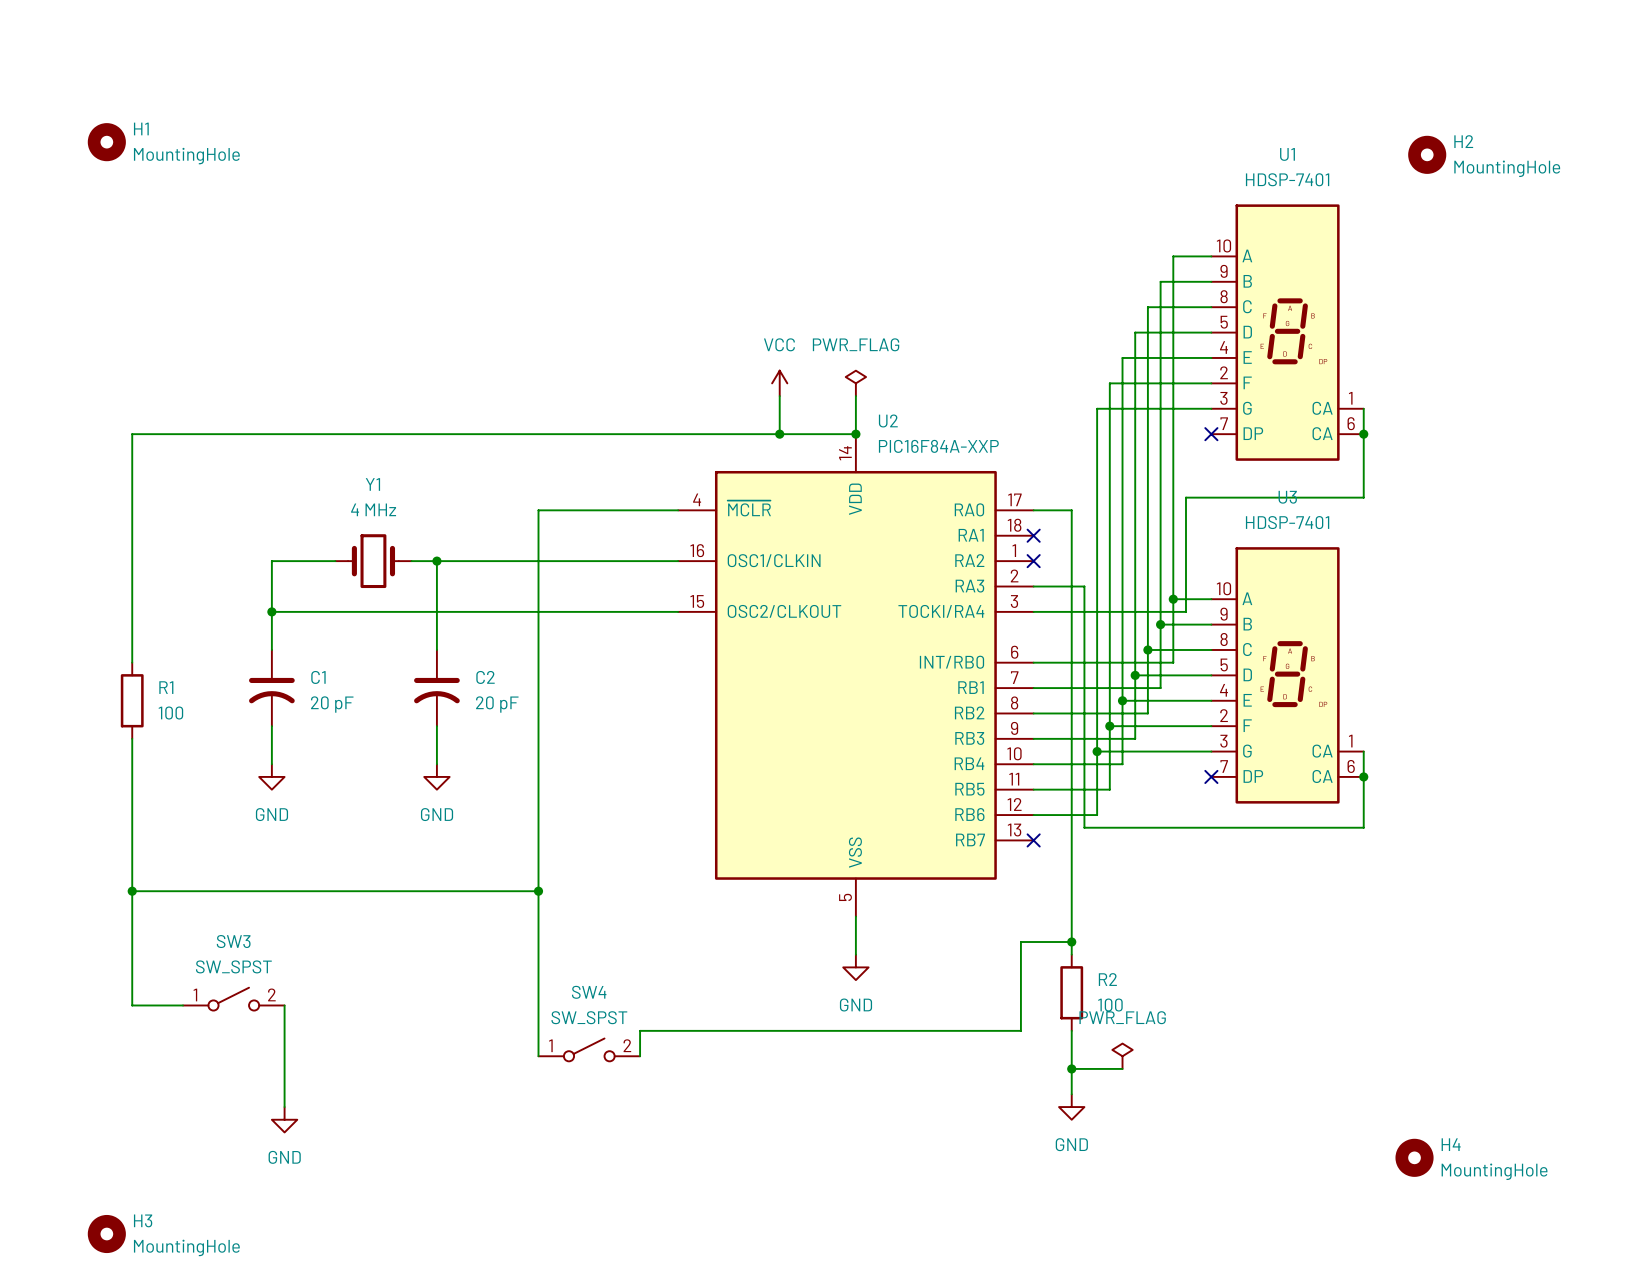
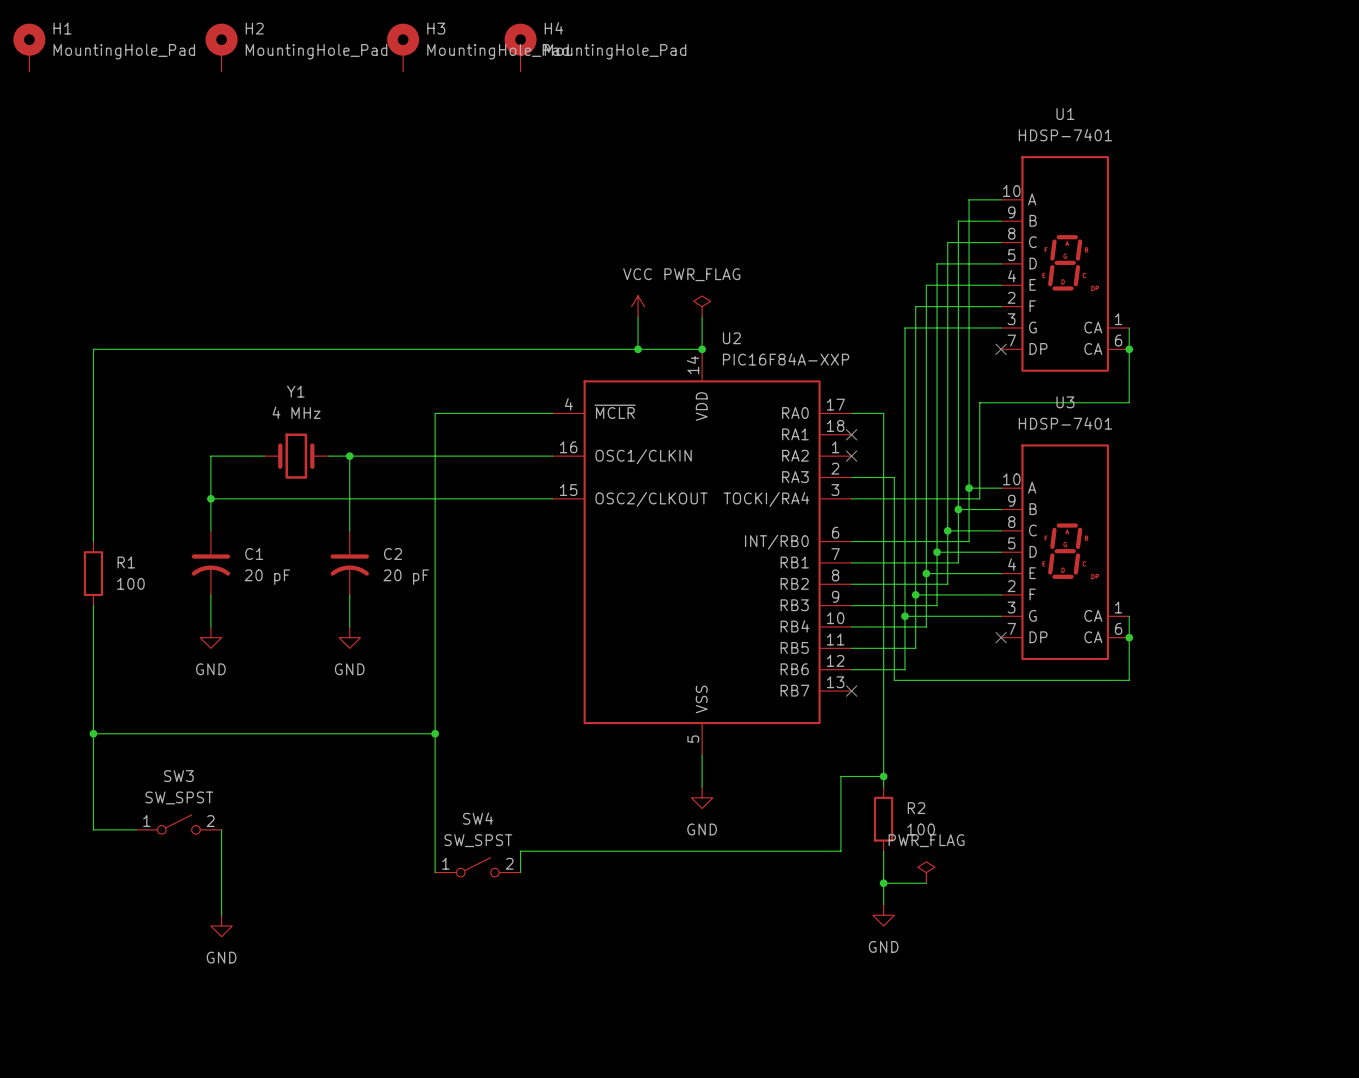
H1 symbol: [87, 123, 126, 162] -> [13, 23, 46, 72]
H2 symbol: [1408, 135, 1447, 174] -> [205, 23, 238, 72]
H1 value: MountingHole (186, 156) -> MountingHole_Pad (124, 51)
H2 value: MountingHole (1507, 168) -> MountingHole_Pad (316, 51)
H4 symbol: [1395, 1138, 1434, 1177] -> [504, 23, 537, 72]
H4 value: MountingHole (1494, 1171) -> MountingHole_Pad (615, 51)
H3 symbol: [87, 1214, 126, 1254] -> [387, 23, 420, 72]
H3 value: MountingHole (186, 1247) -> MountingHole_Pad (498, 51)

